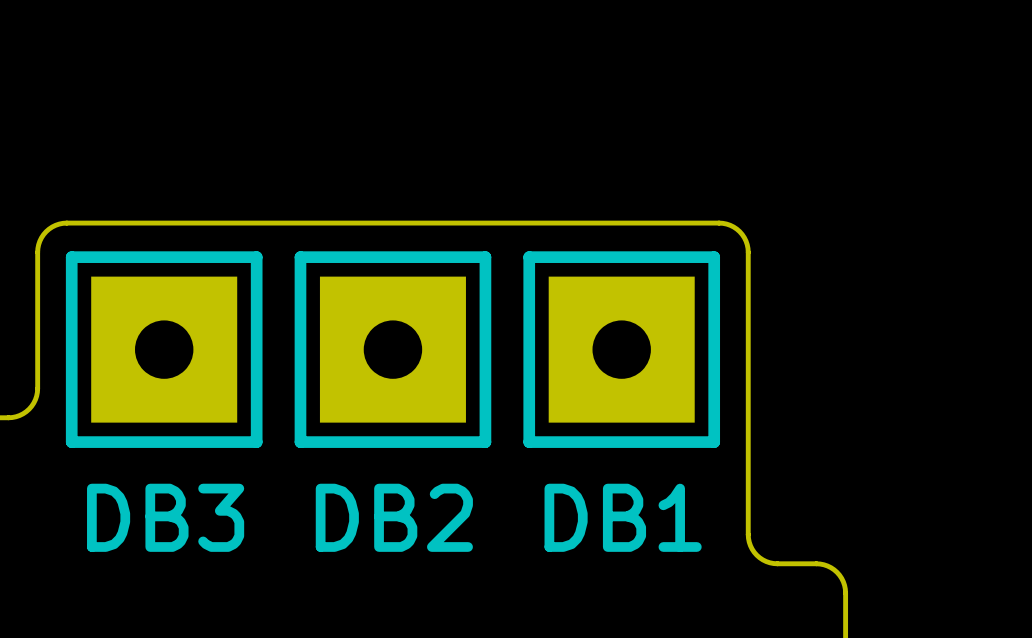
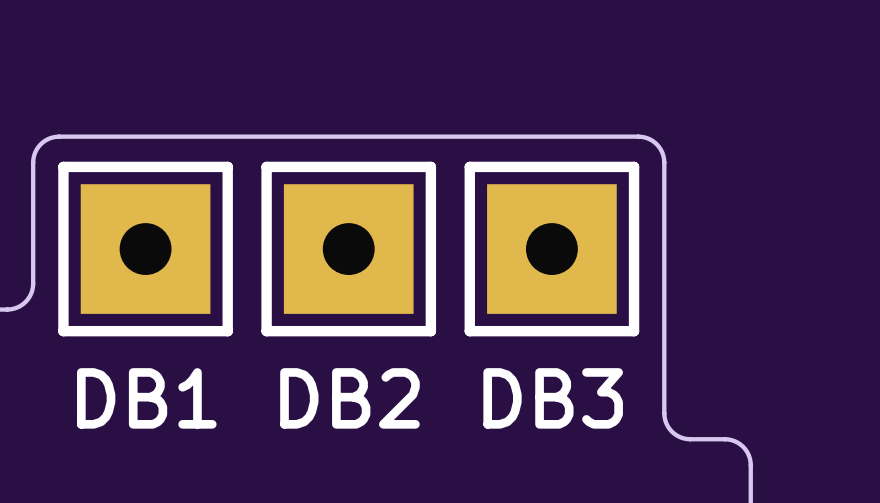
DB3 name: DB3 (165, 517) -> DB1 (146, 398)
DB1 name: DB1 (623, 517) -> DB3 (553, 398)

